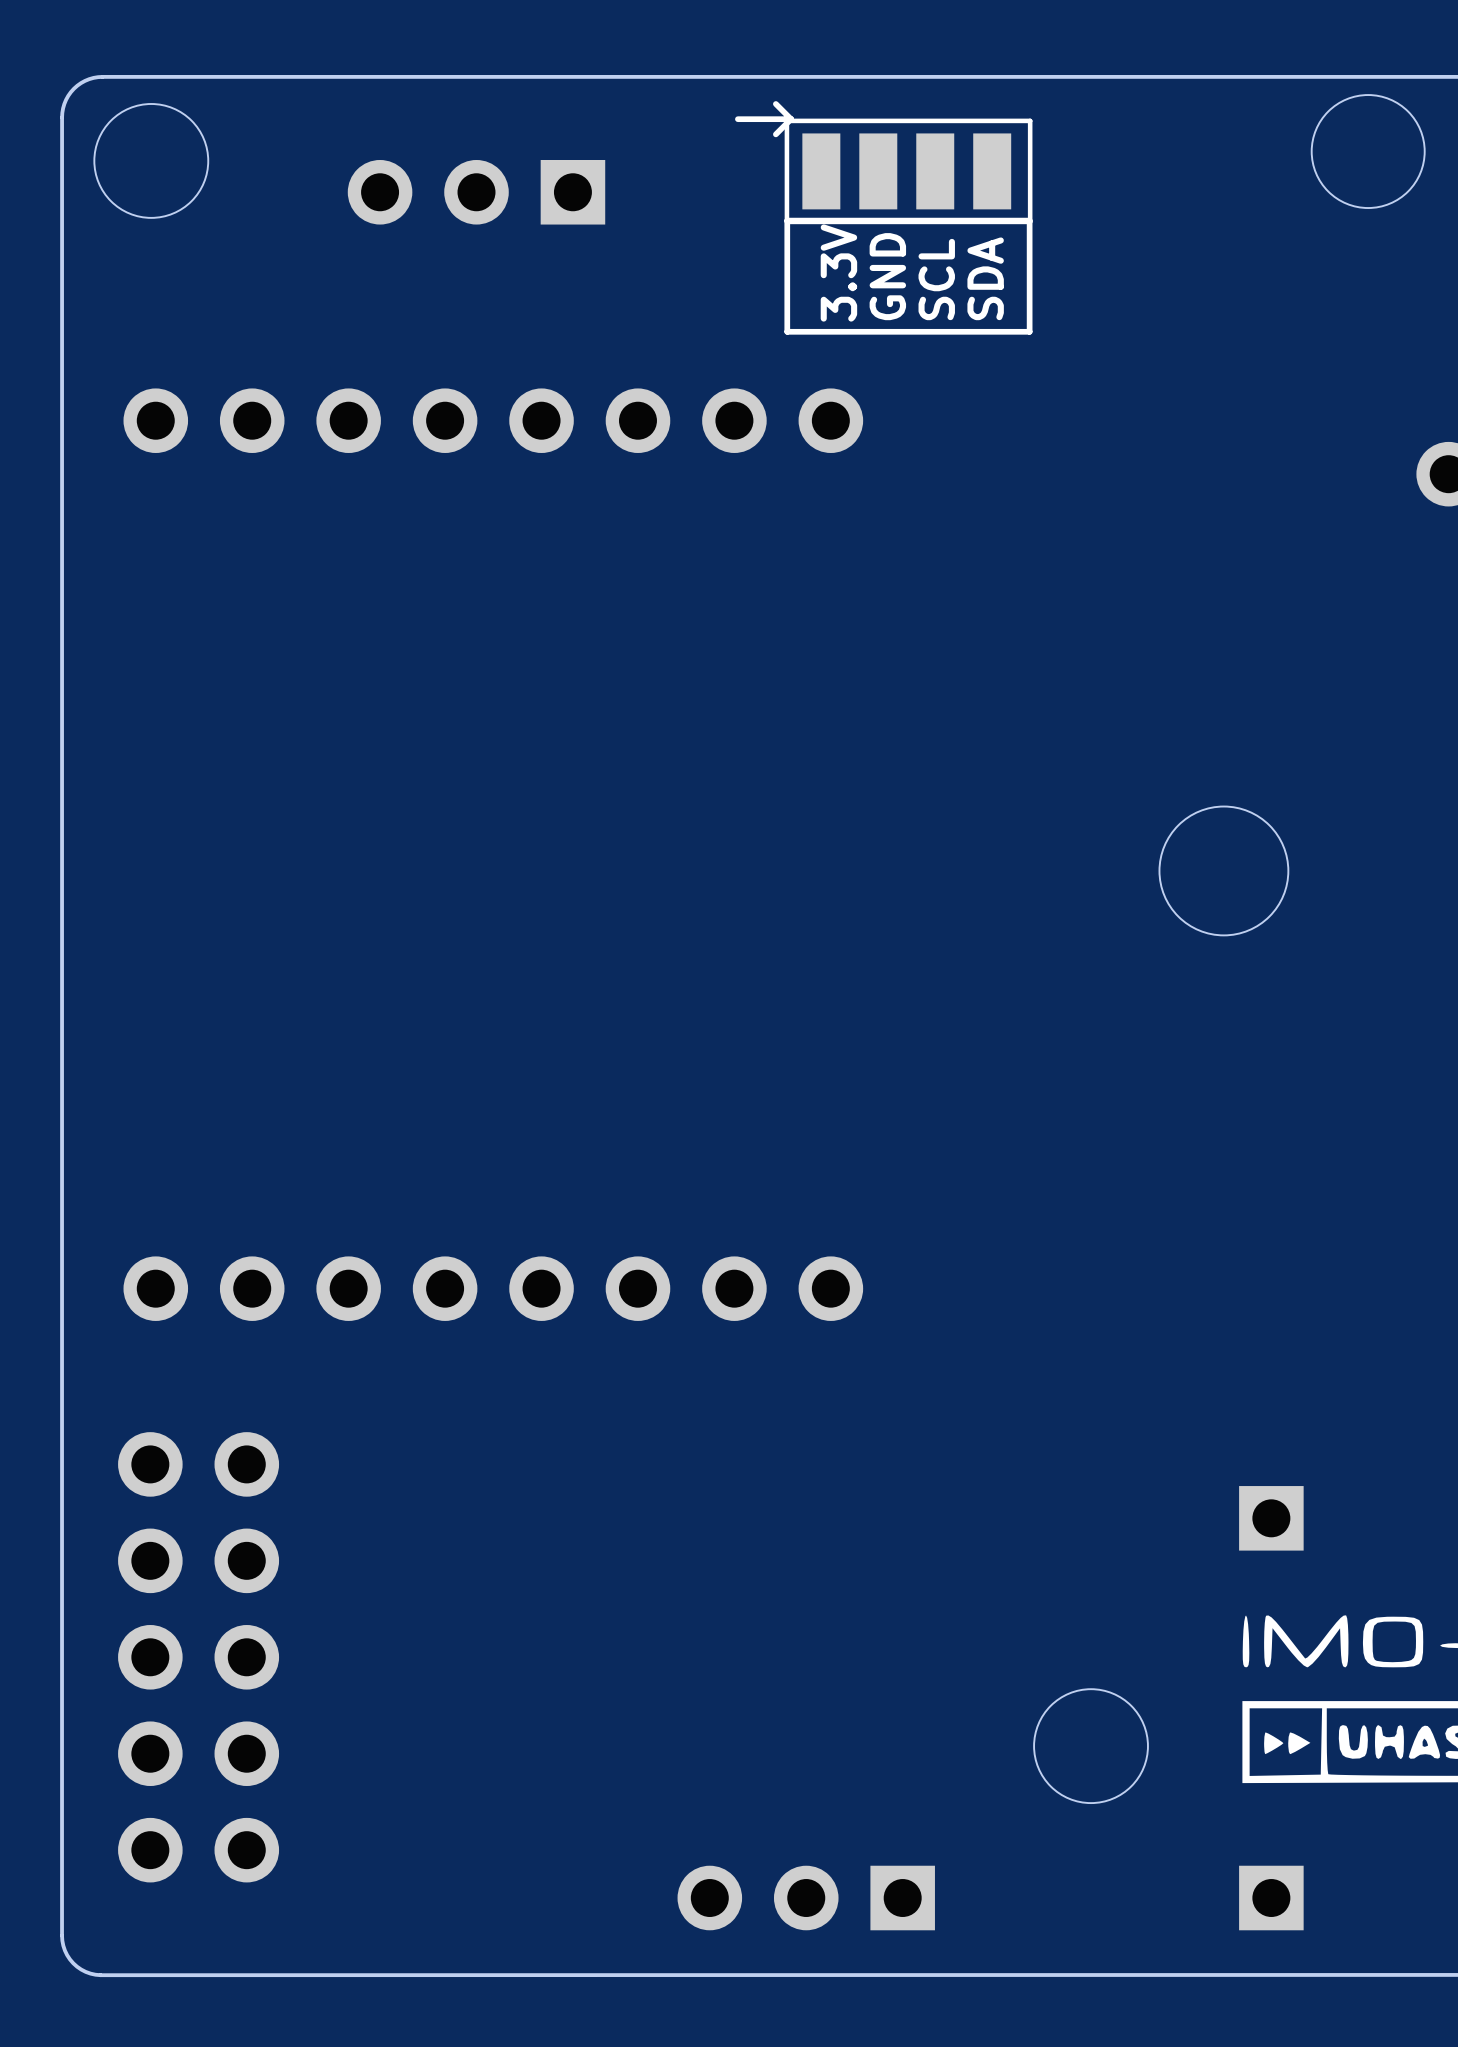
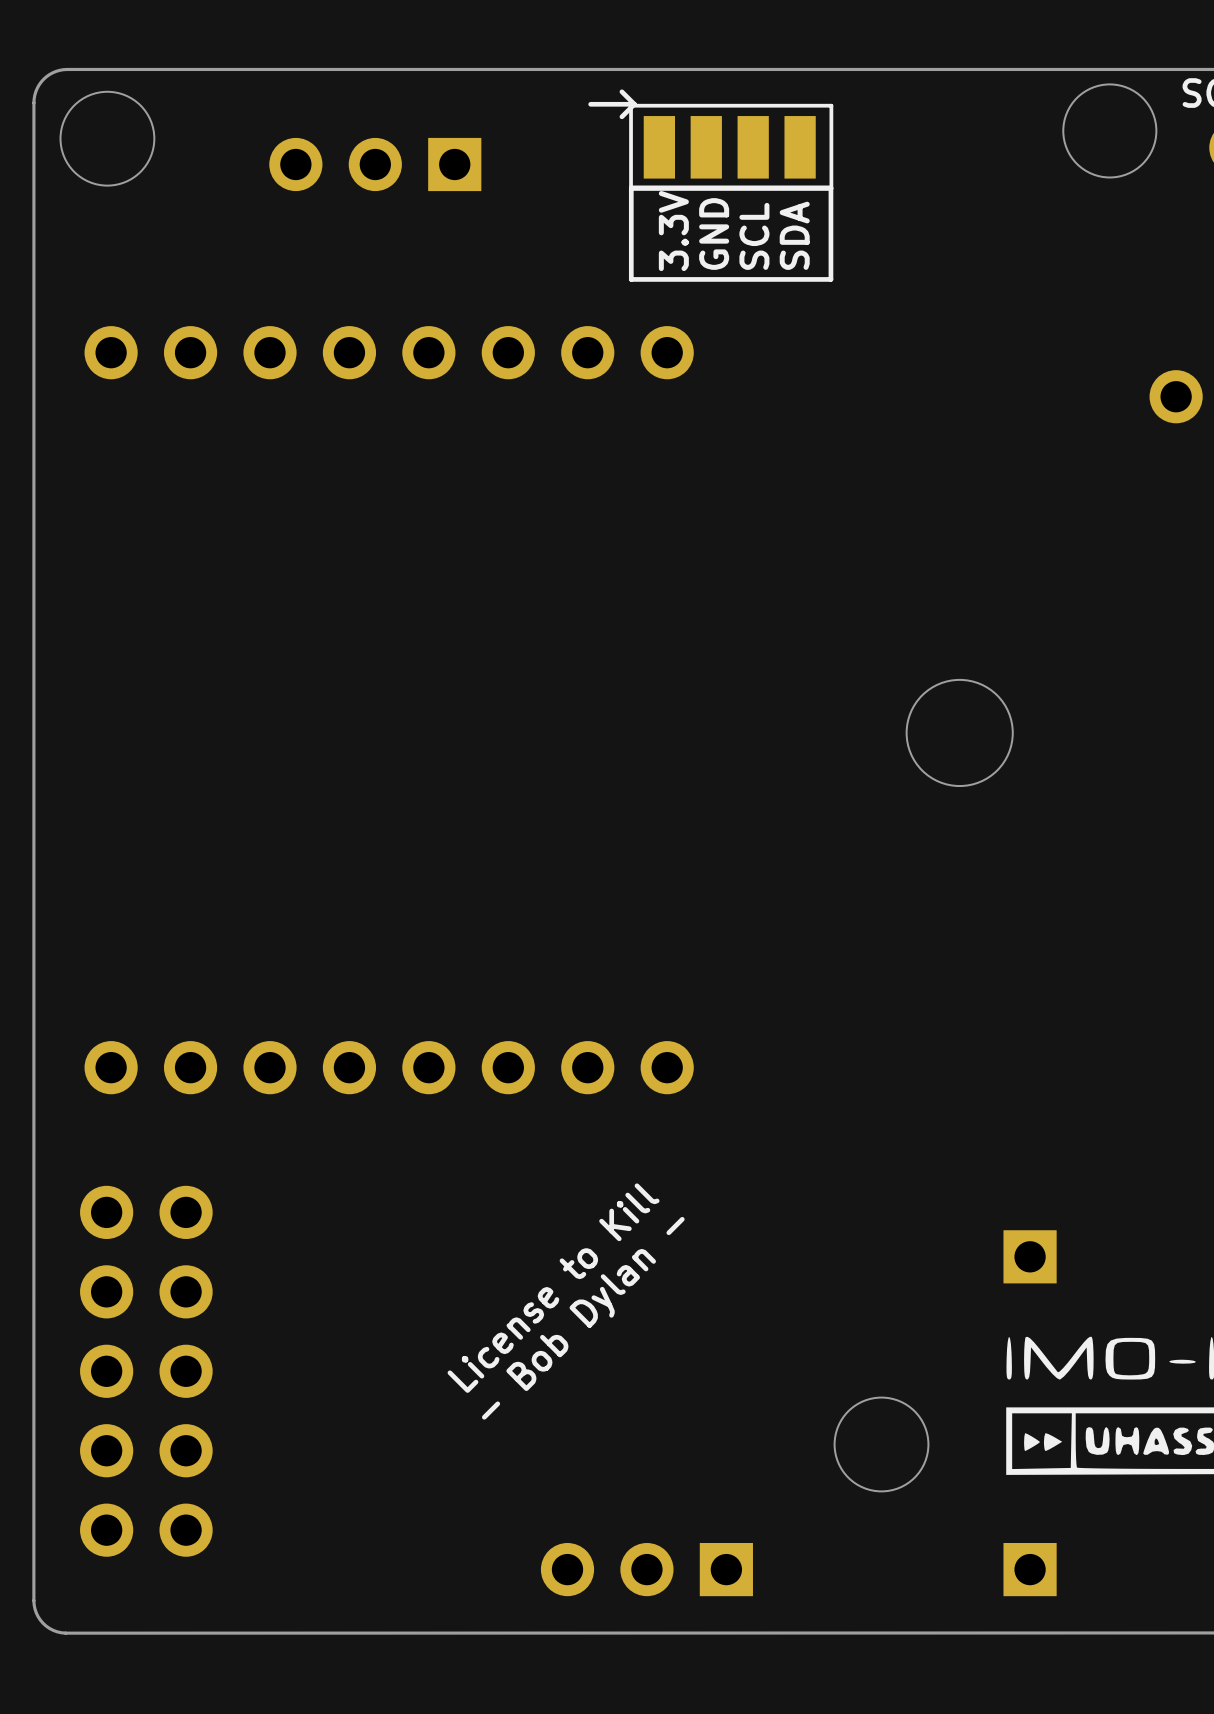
round board edge position: (1223, 870) -> (959, 732)
text: none -> License to Kill (553, 1288)
text: none -> - Bob Dylan - (583, 1318)

